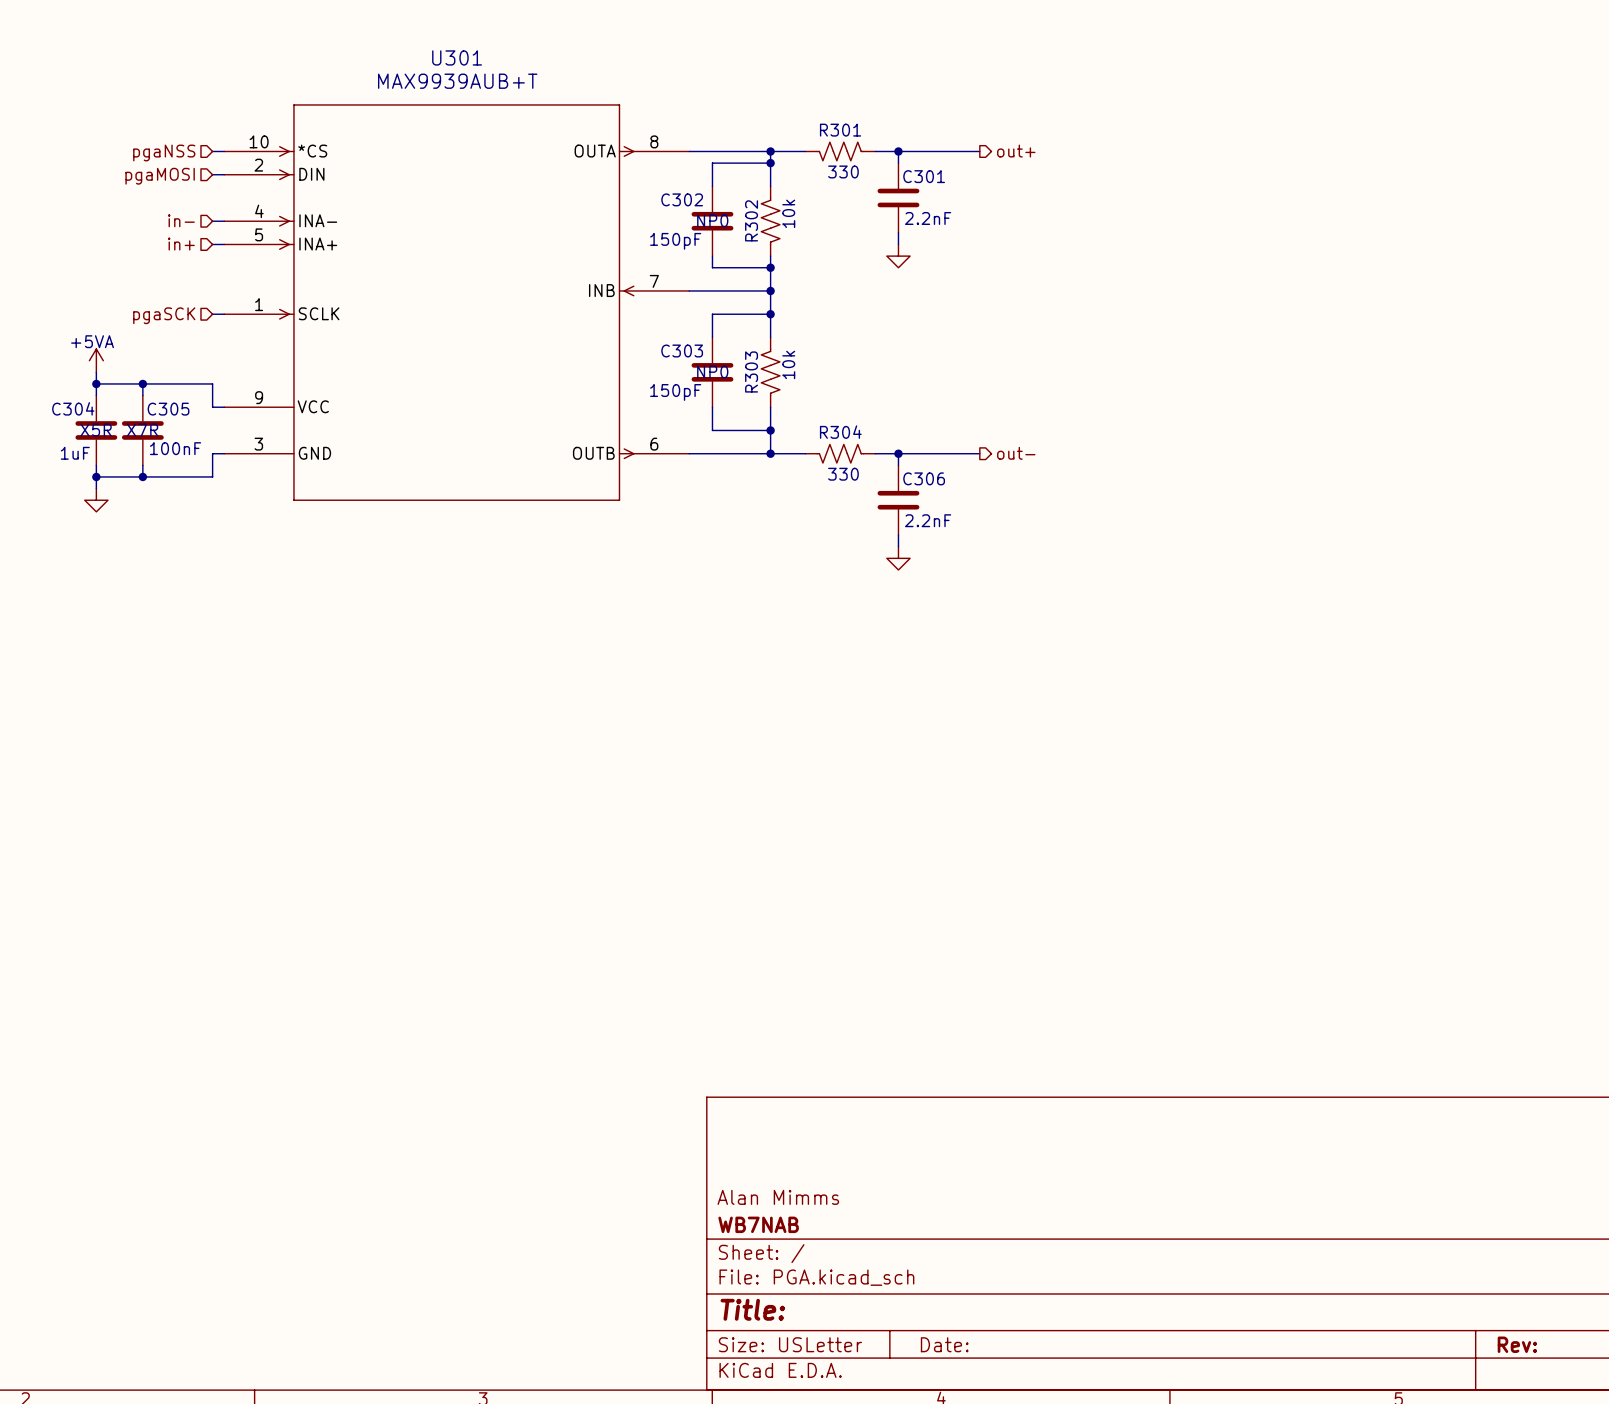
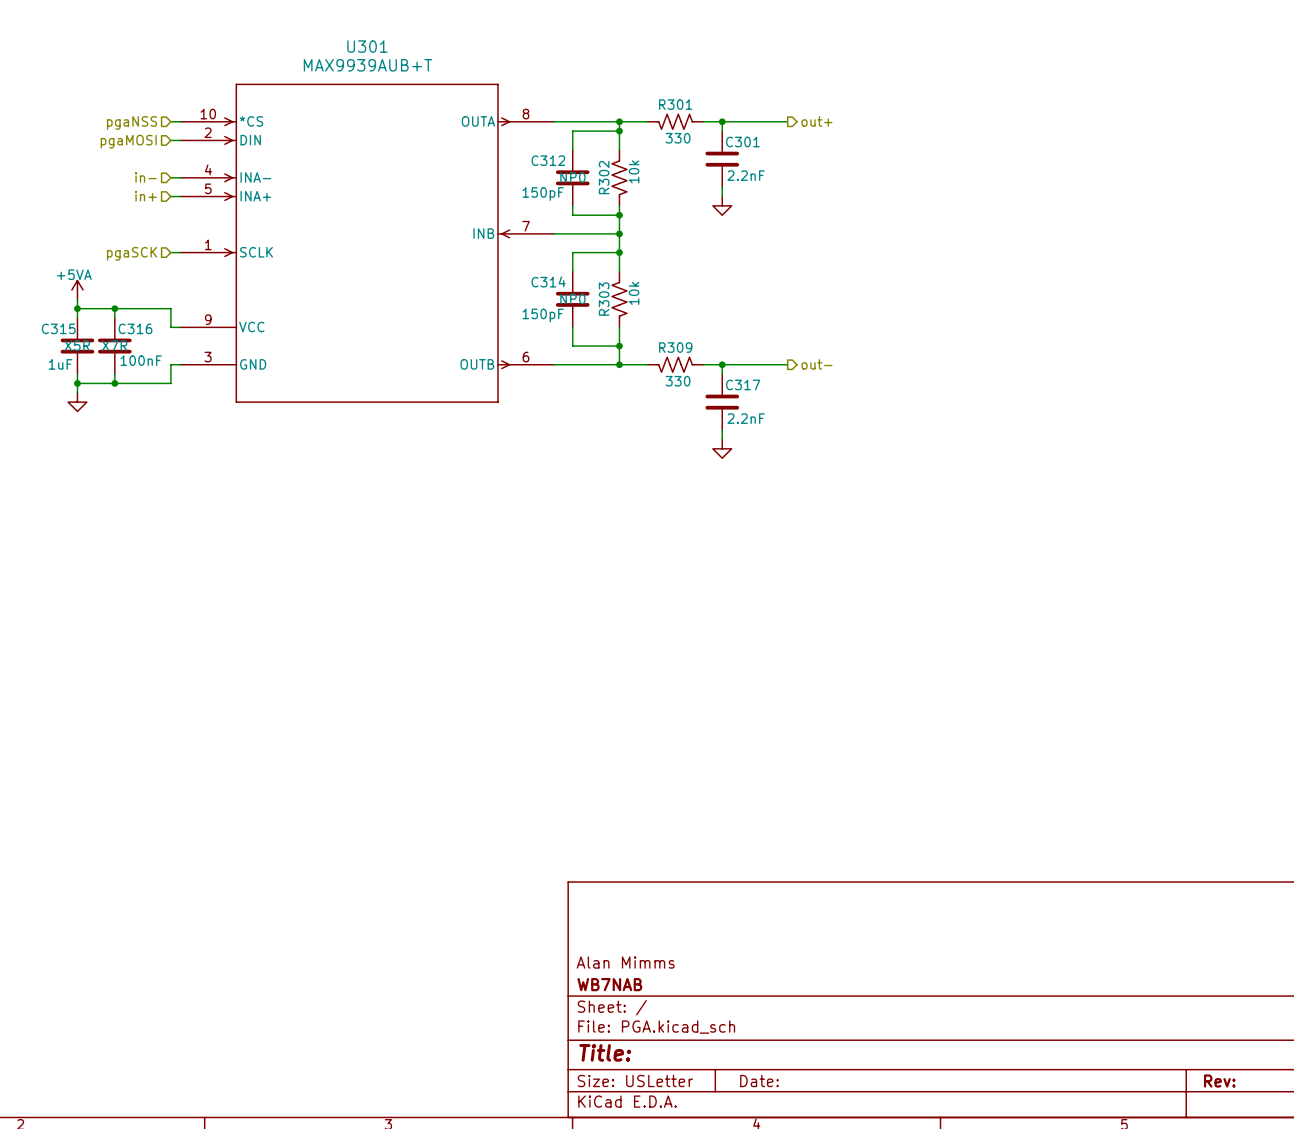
C302 name: C302 (682, 199) -> C312 (548, 160)
C303 name: C303 (682, 350) -> C314 (548, 281)
C304 name: C304 (73, 408) -> C315 (58, 328)
C305 name: C305 (168, 409) -> C316 (135, 328)
R304 name: R304 (840, 432) -> R309 (675, 347)
C306 name: C306 (924, 478) -> C317 (743, 384)

